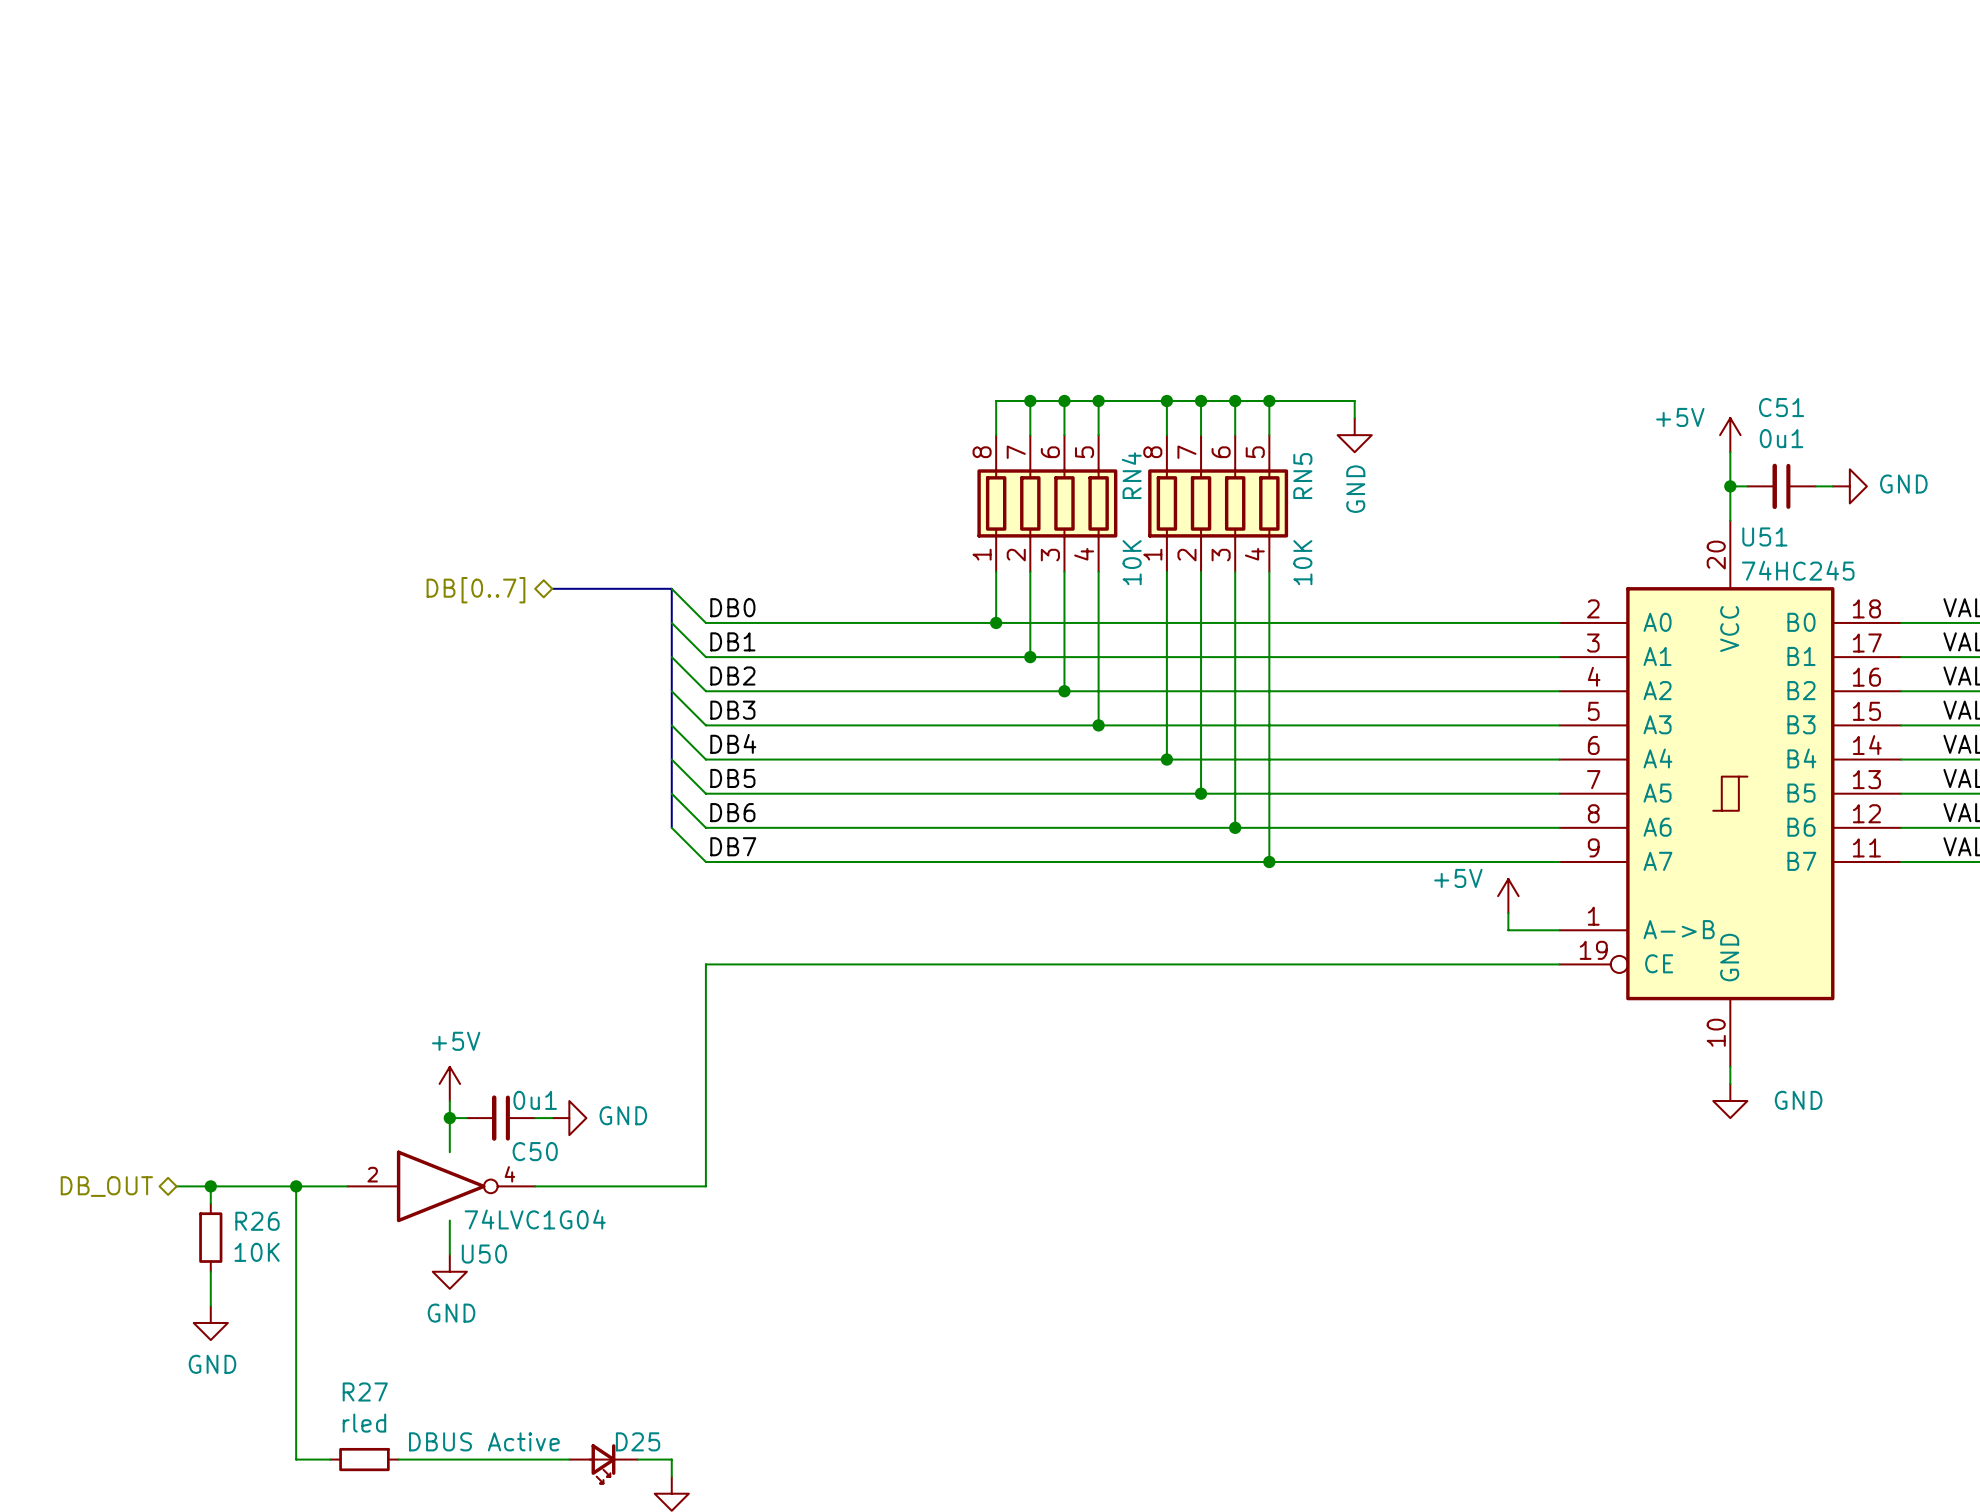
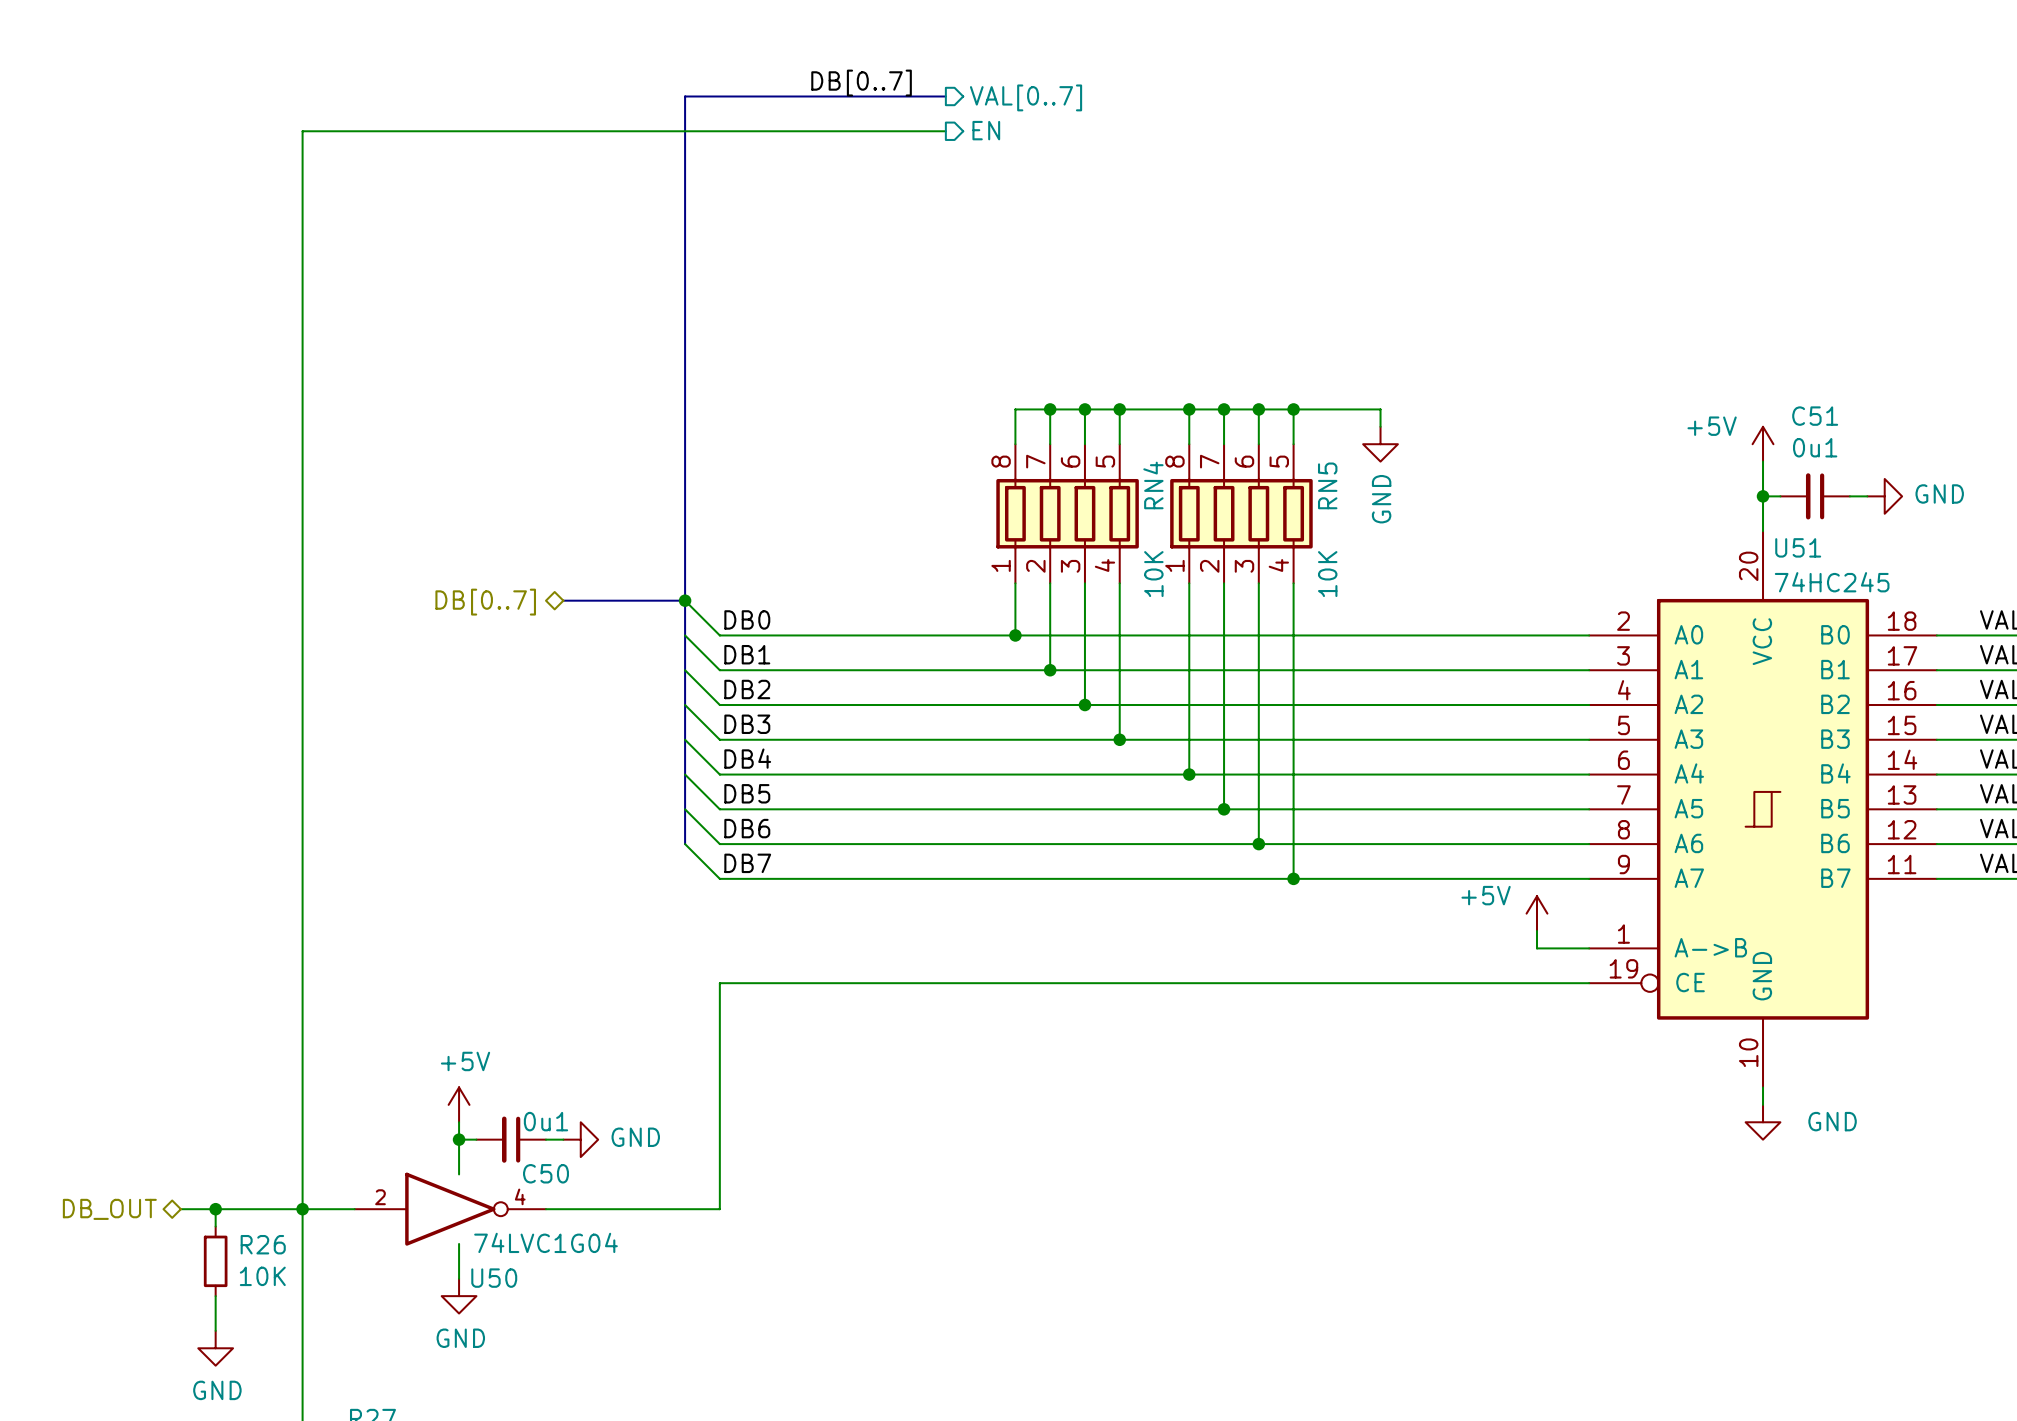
label: none -> DB[0..7] (861, 83)
bus: none -> (945, 96) (685, 96) (685, 600)
sheet pin: none -> VAL[0..7] (1026, 97)
wire: none -> (945, 131) (302, 131) (302, 1209)
sheet pin: none -> EN (986, 130)
junction: none -> (685, 600)

